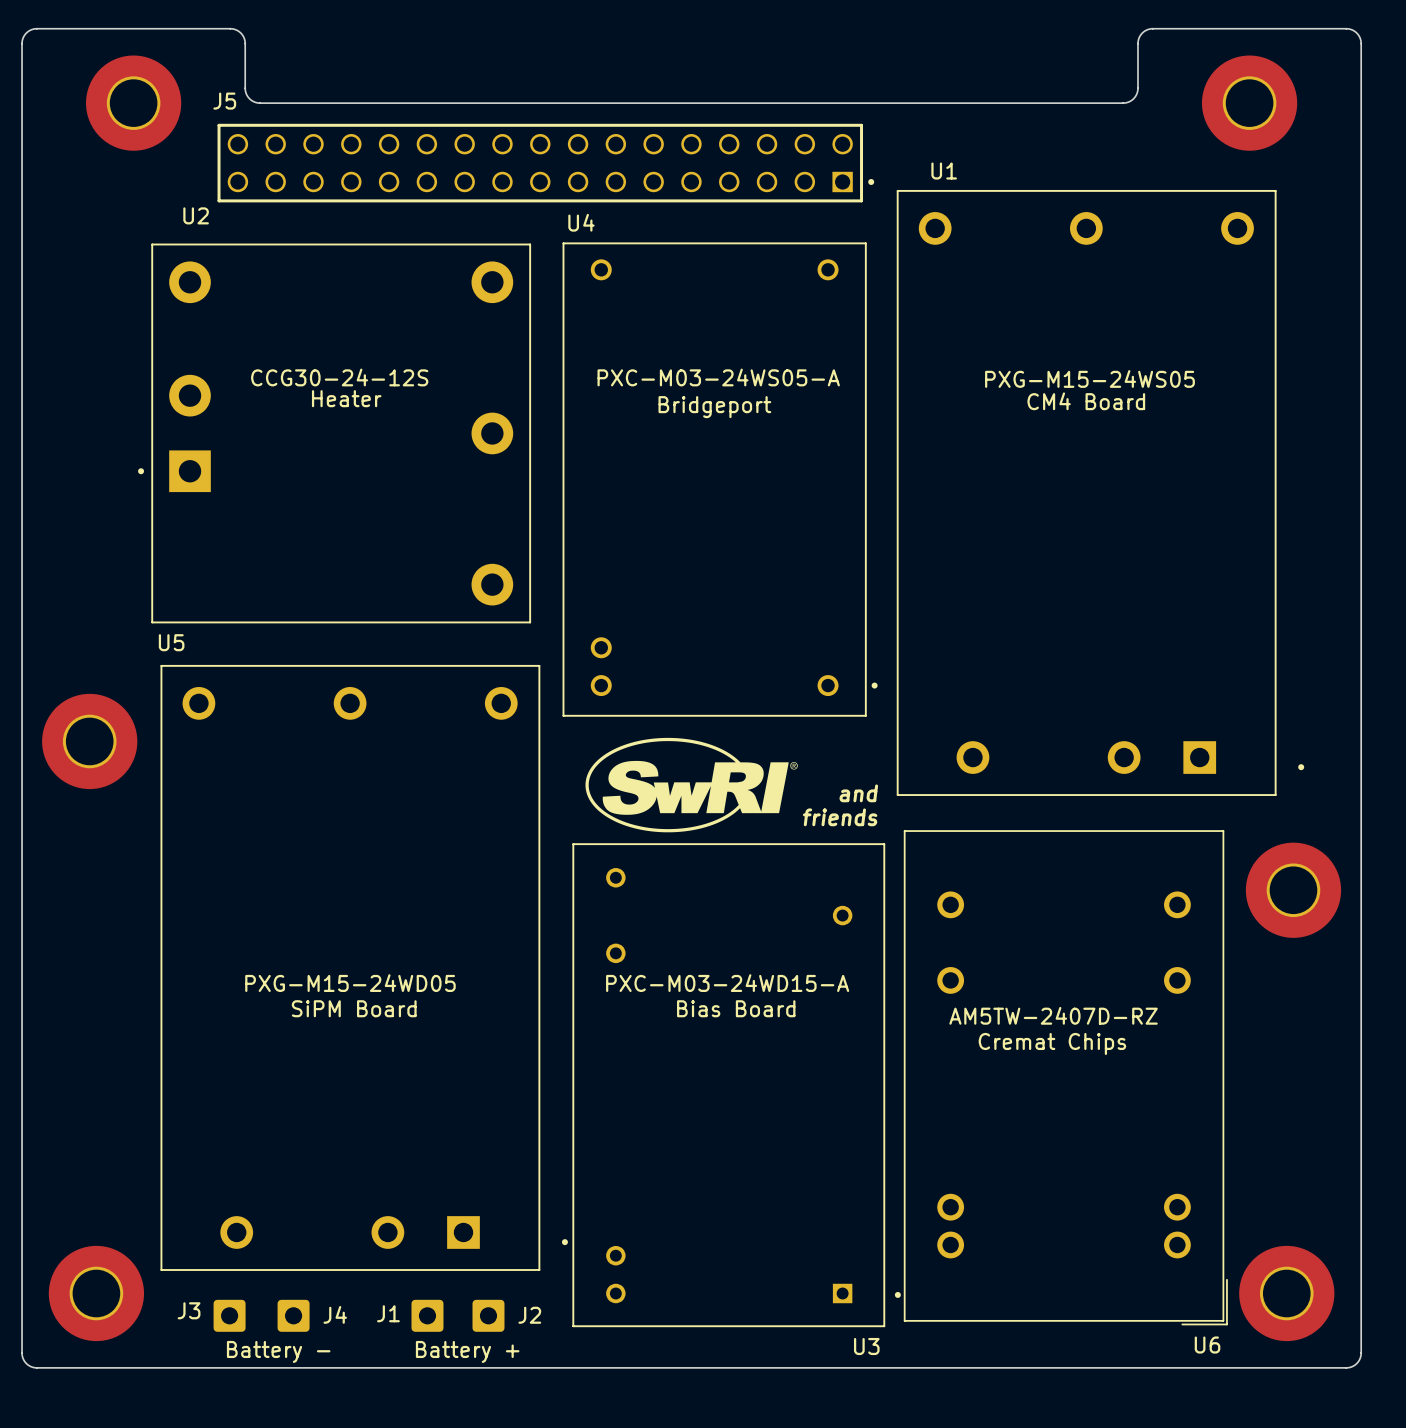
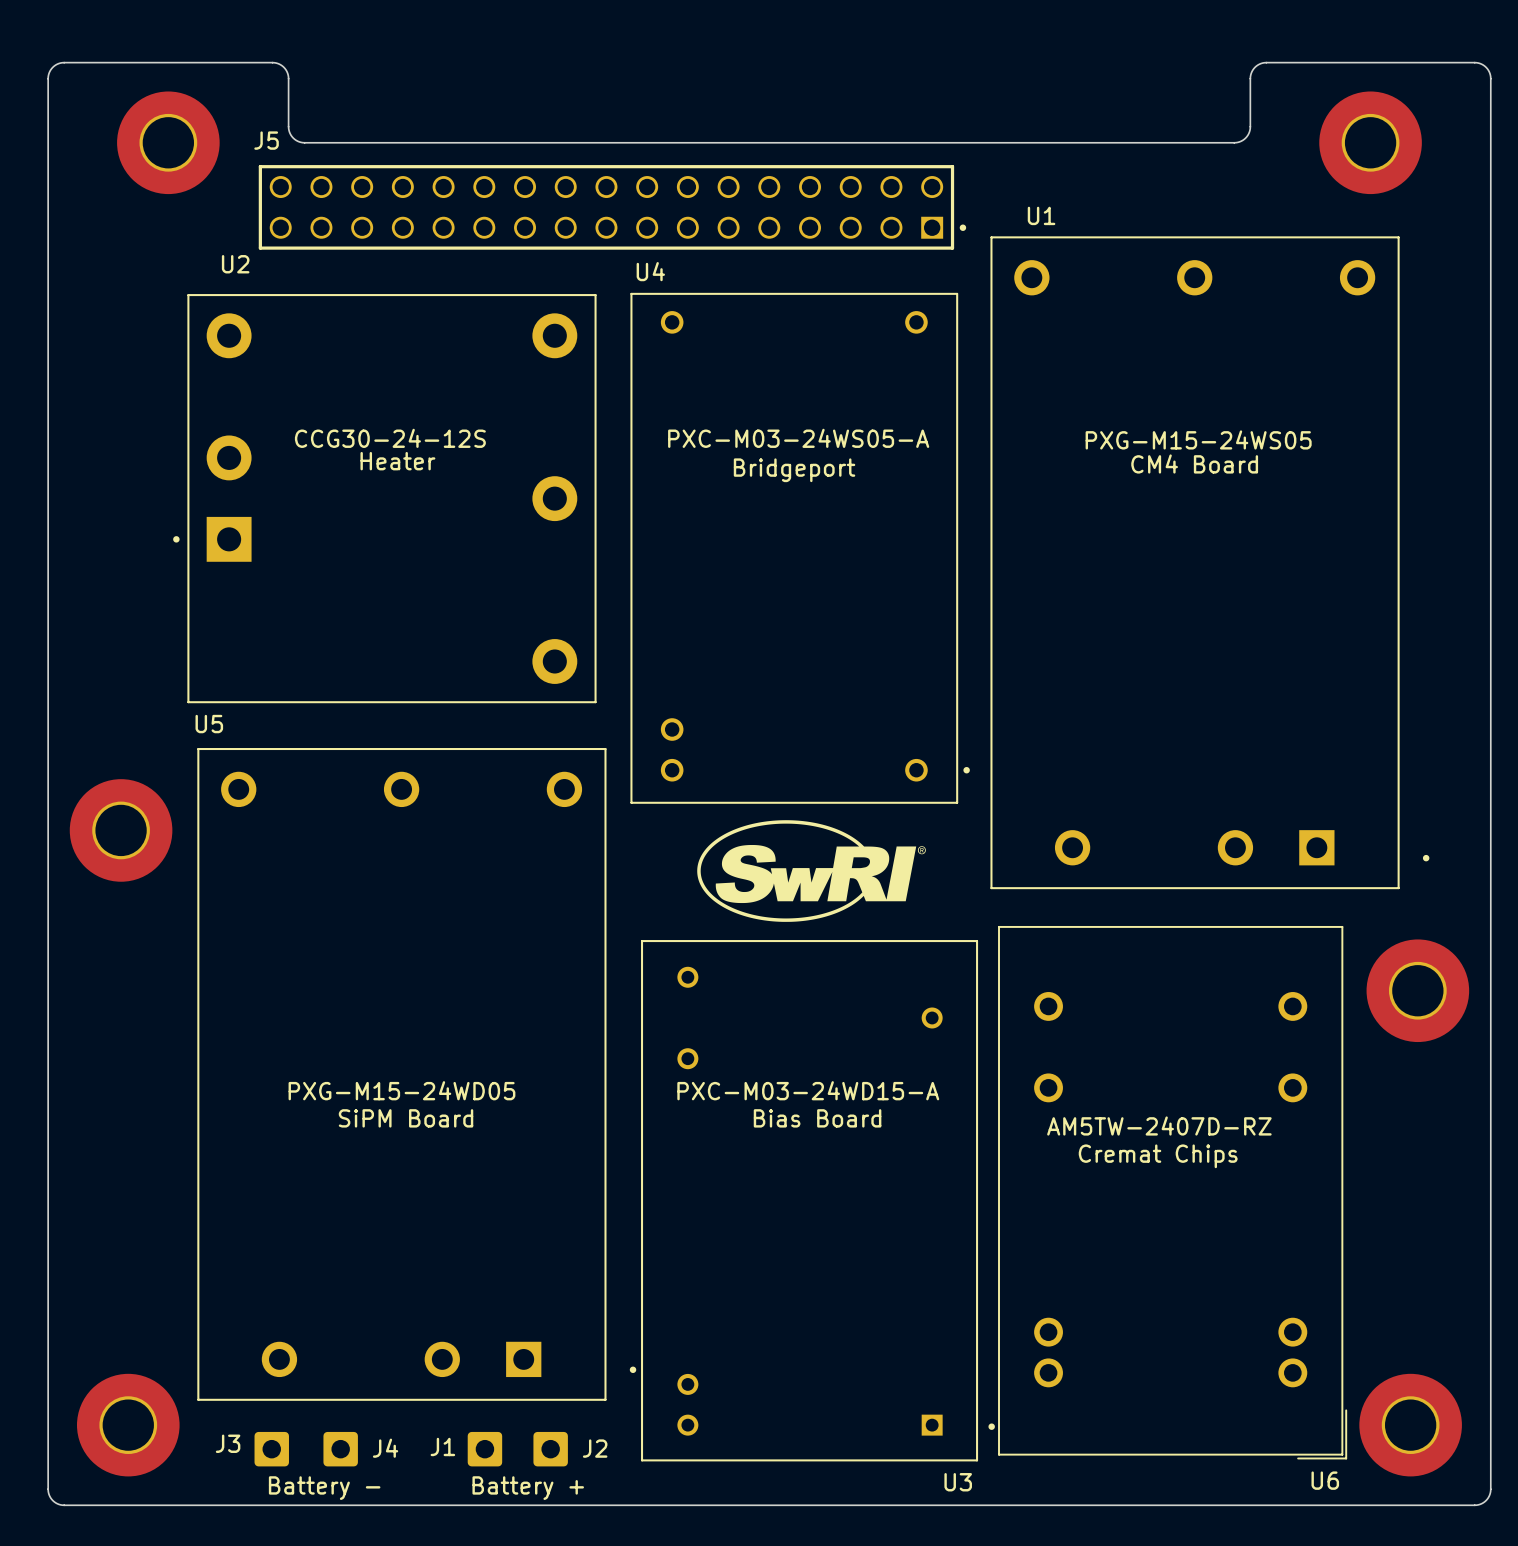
drawing position: (691, 785) -> (811, 871)
text: and (858, 793) -> none
text: friends (840, 817) -> none

